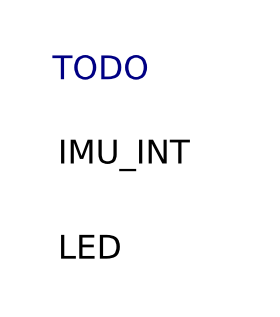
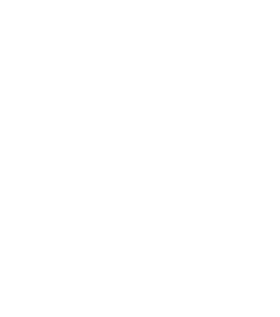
text: TODO (99, 67) -> none
label: IMU_INT (125, 155) -> none
label: LED (90, 246) -> none

